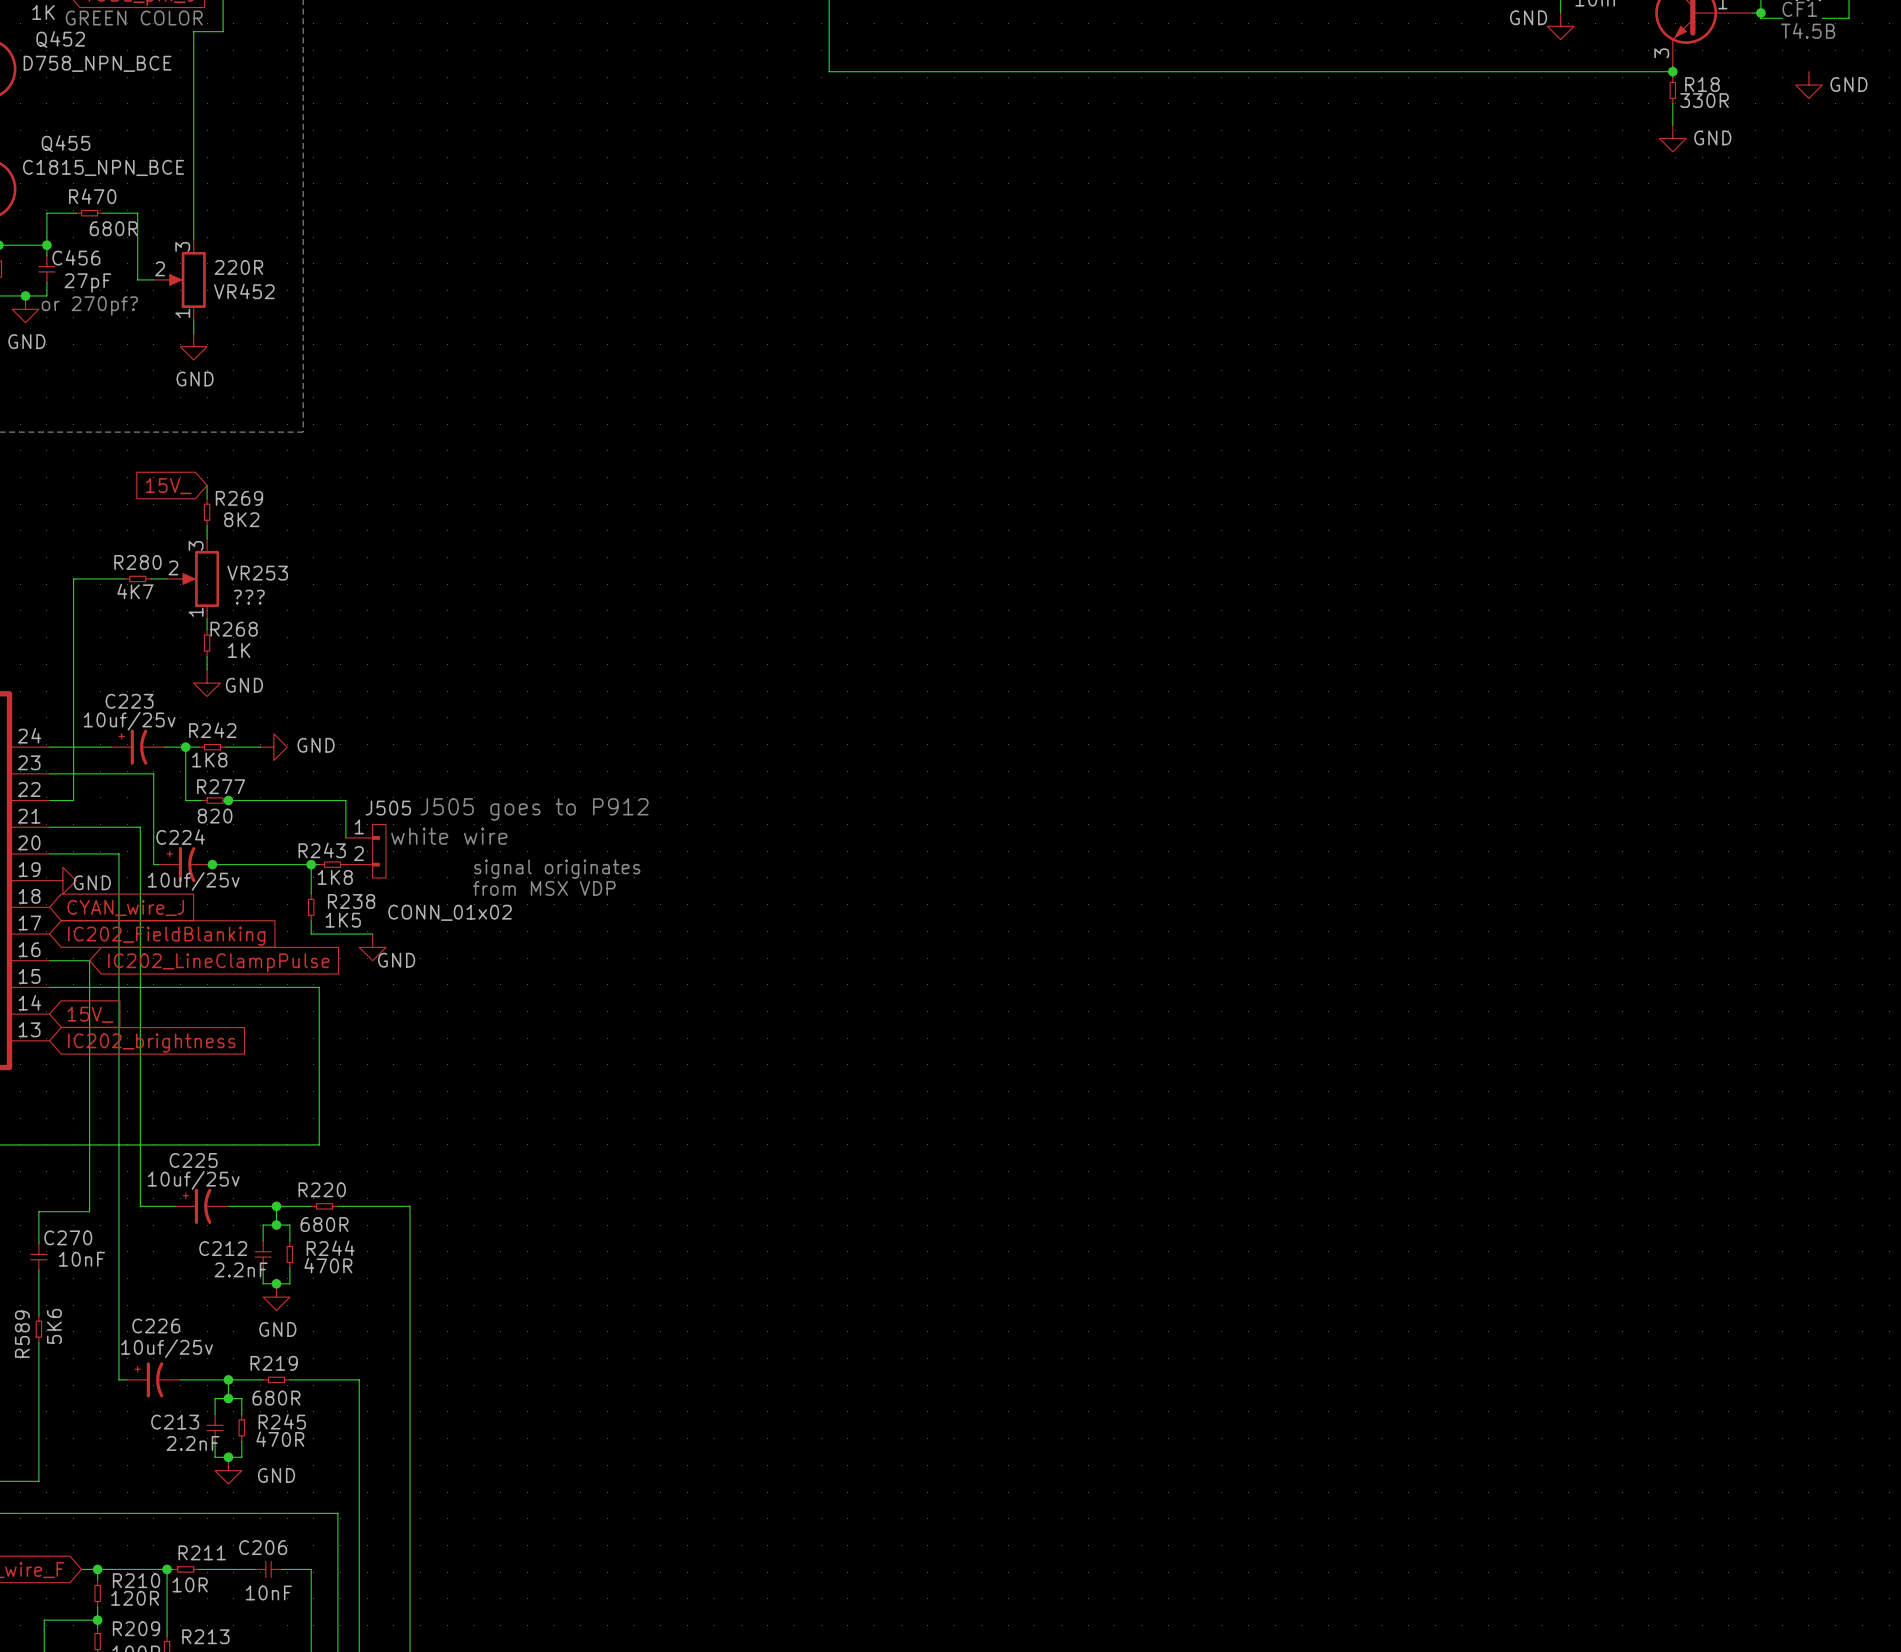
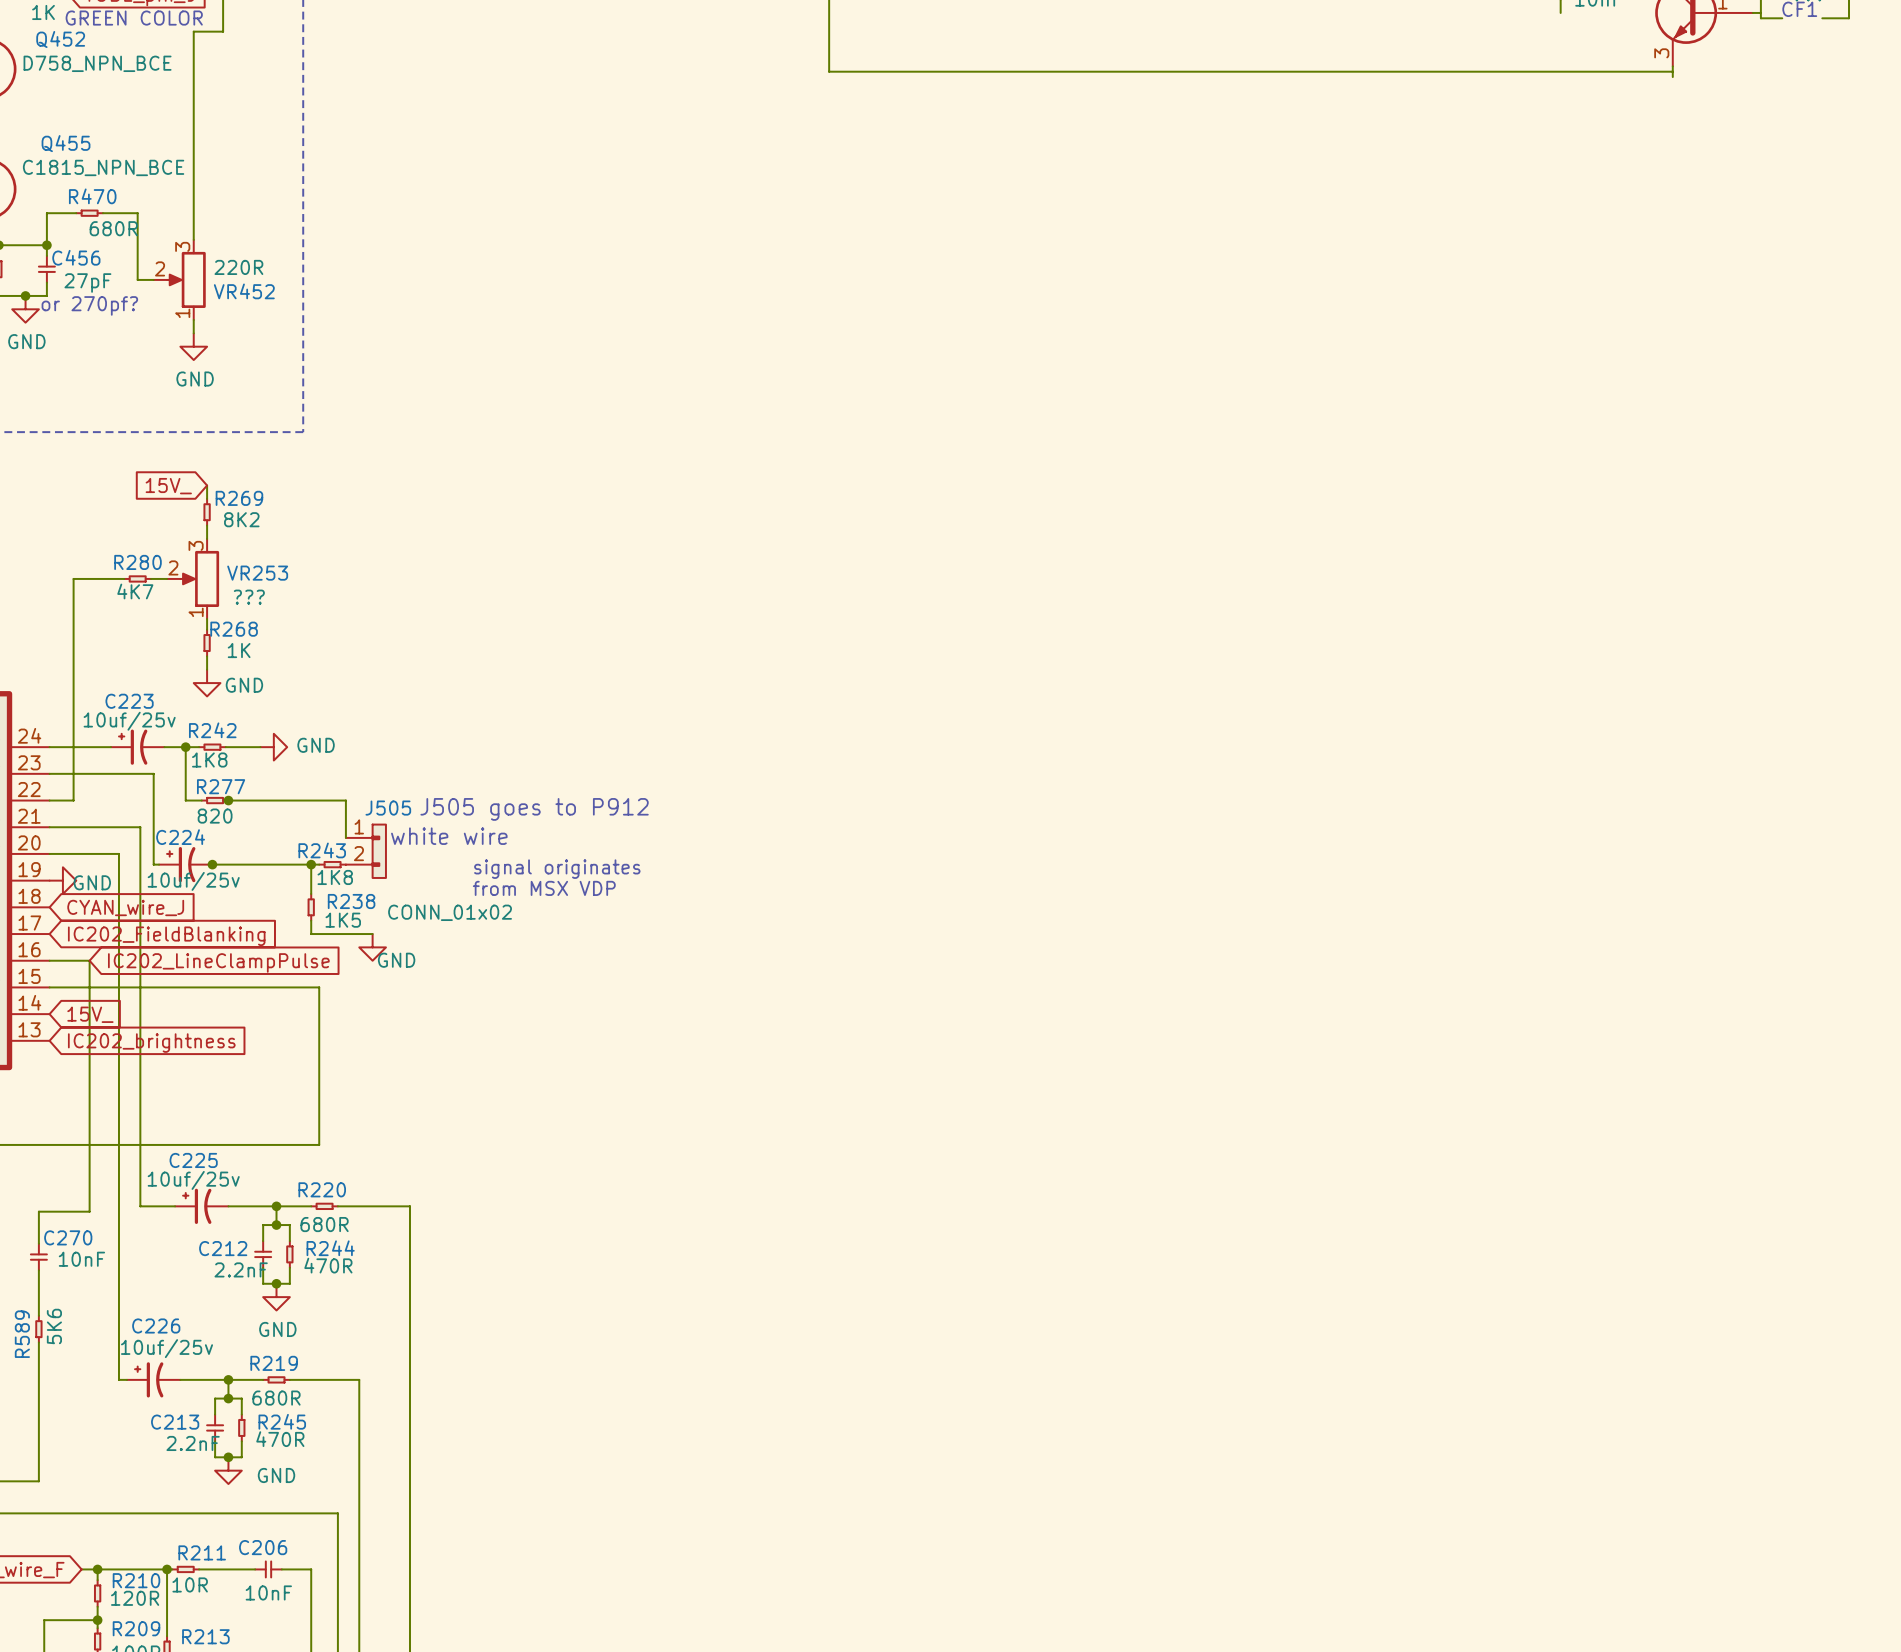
junction: (1760, 12) -> none
power symbol: GND (1560, 26) -> none
text: T4.5B (1808, 30) -> none
junction: (1672, 71) -> none
power symbol: GND (1808, 85) -> none
R18: 330R (1672, 90) -> none
wire: (1672, 103) (1672, 125) -> none
power symbol: GND (1672, 138) -> none

